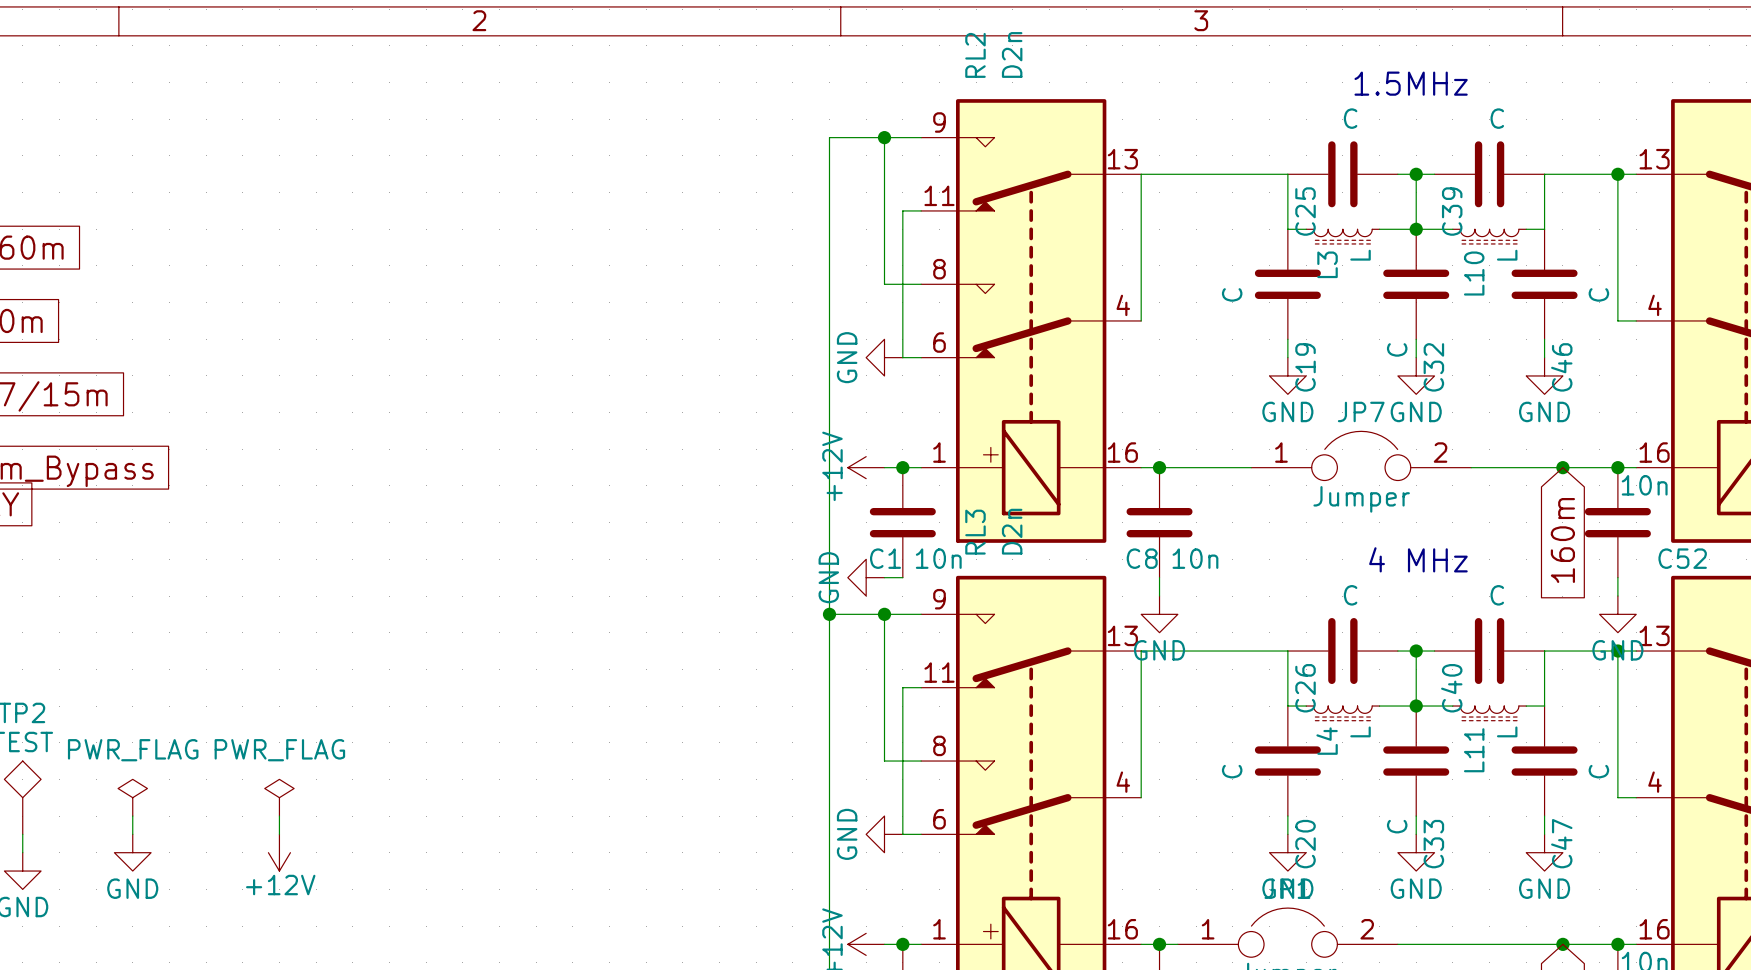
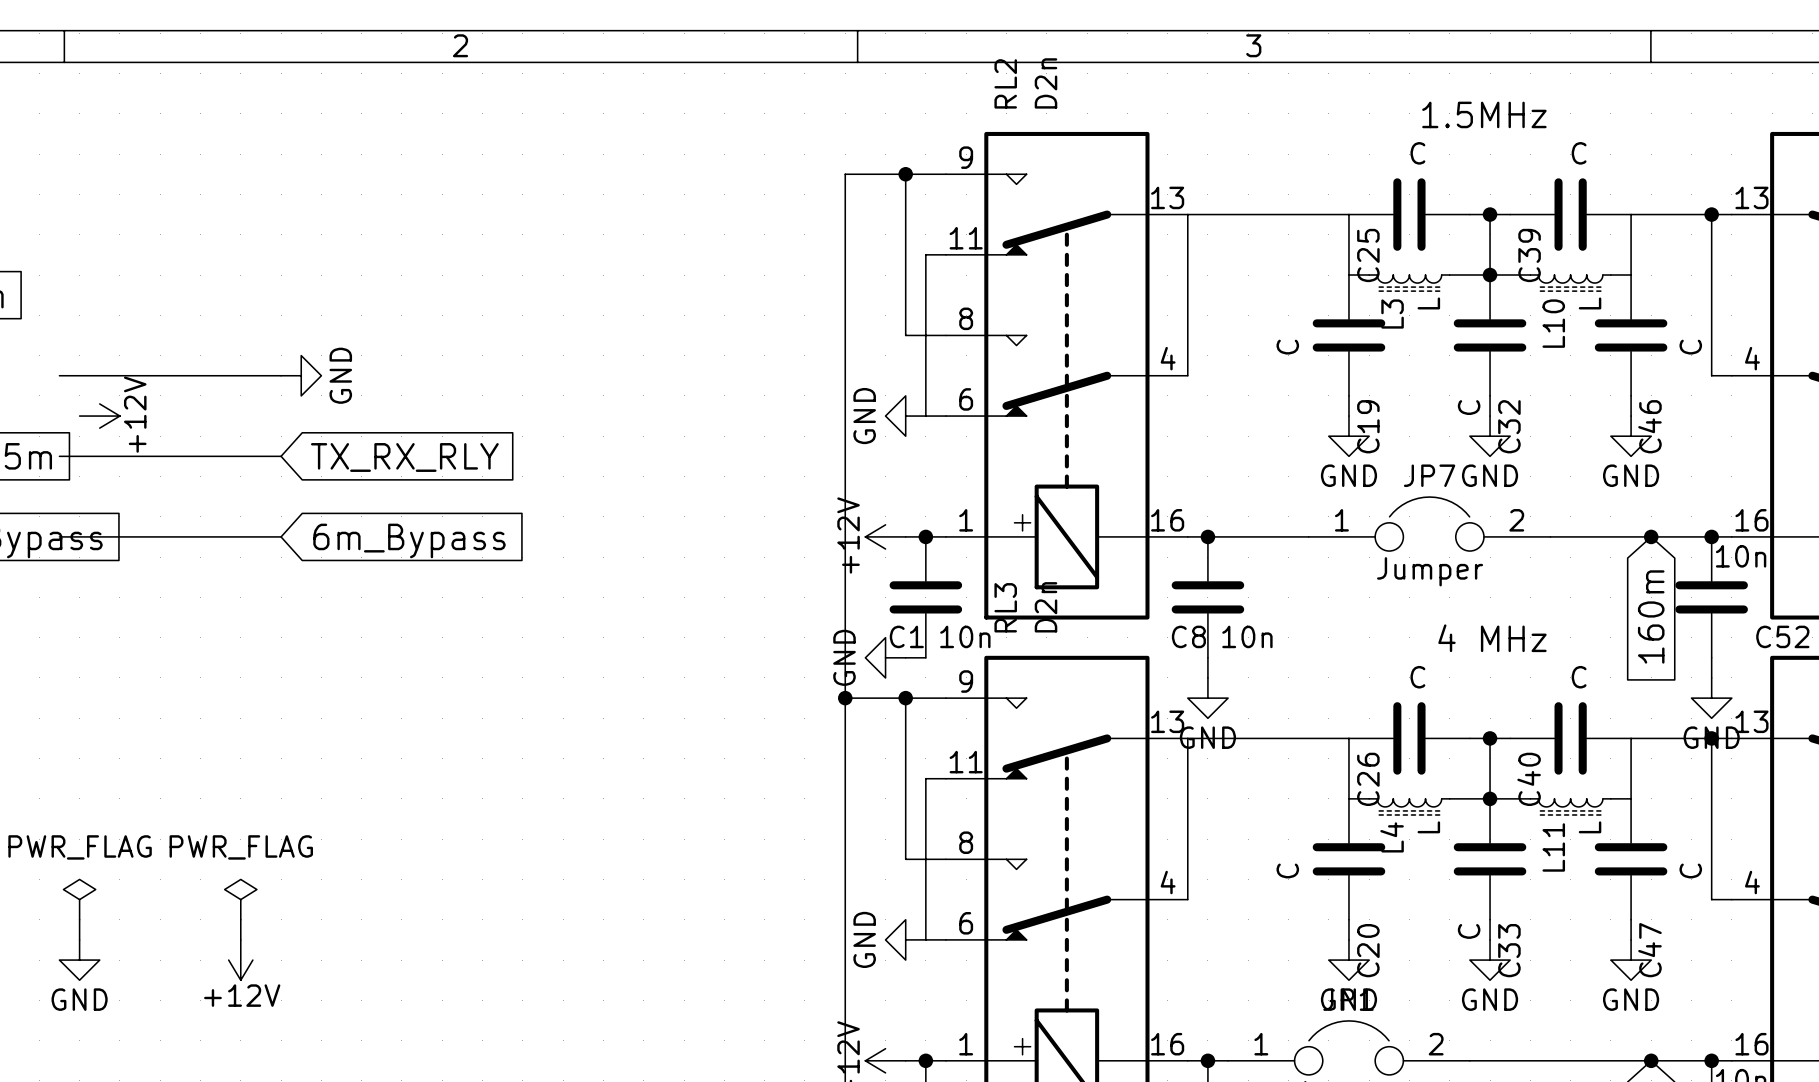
wire: none -> (59, 375) (281, 375)
power symbol: none -> GND (301, 375)
power symbol: none -> +12V (99, 416)
wire: none -> (59, 456) (281, 456)
global label: none -> TX_RX_RLY (404, 457)
wire: none -> (59, 536) (281, 536)
global label: none -> 6m_Bypass (409, 540)

